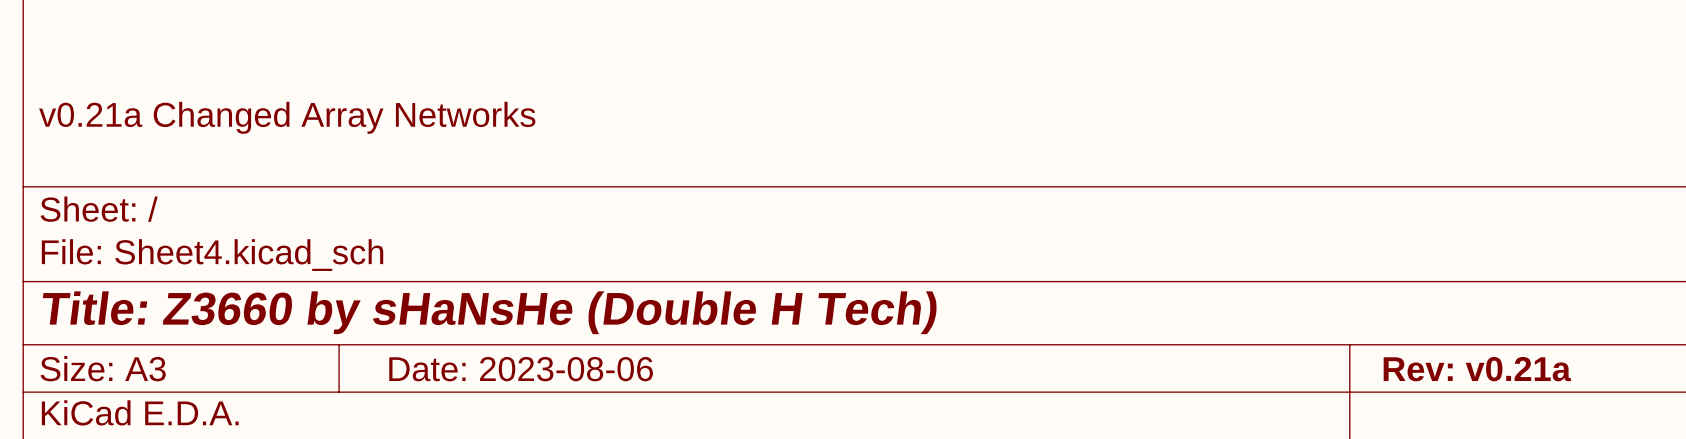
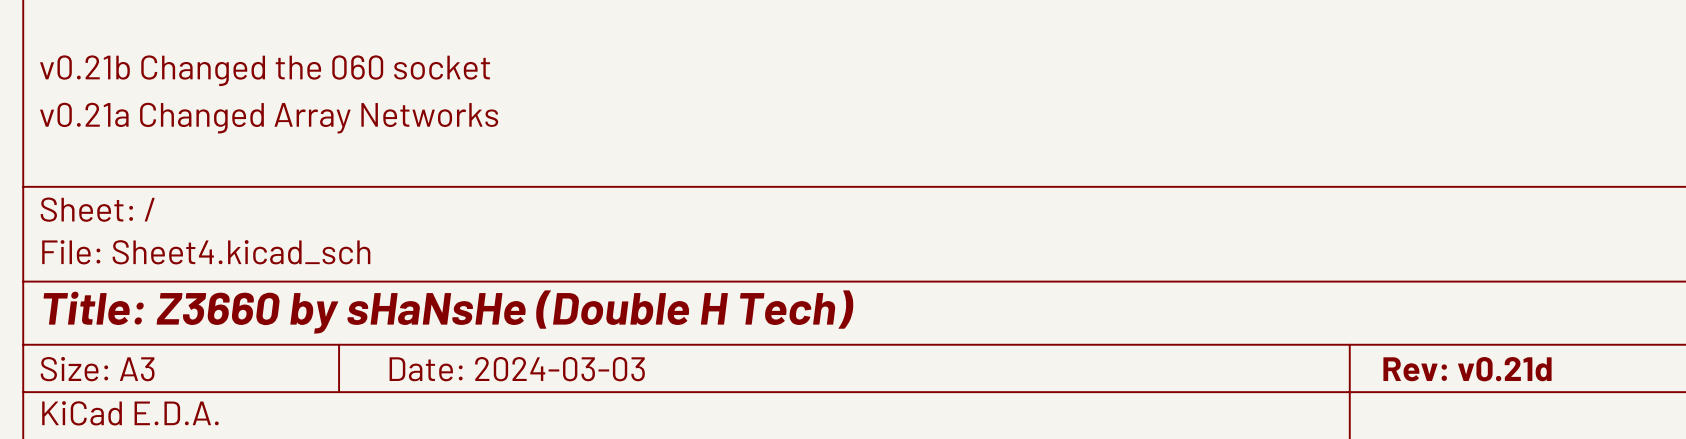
title block: none -> v0.21b Changed the 060 socket (265, 70)
title block: Date: 2023-08-06 (521, 369) -> Date: 2024-03-03 (517, 369)
title block: Rev: v0.21a (1477, 369) -> Rev: v0.21d (1467, 369)

